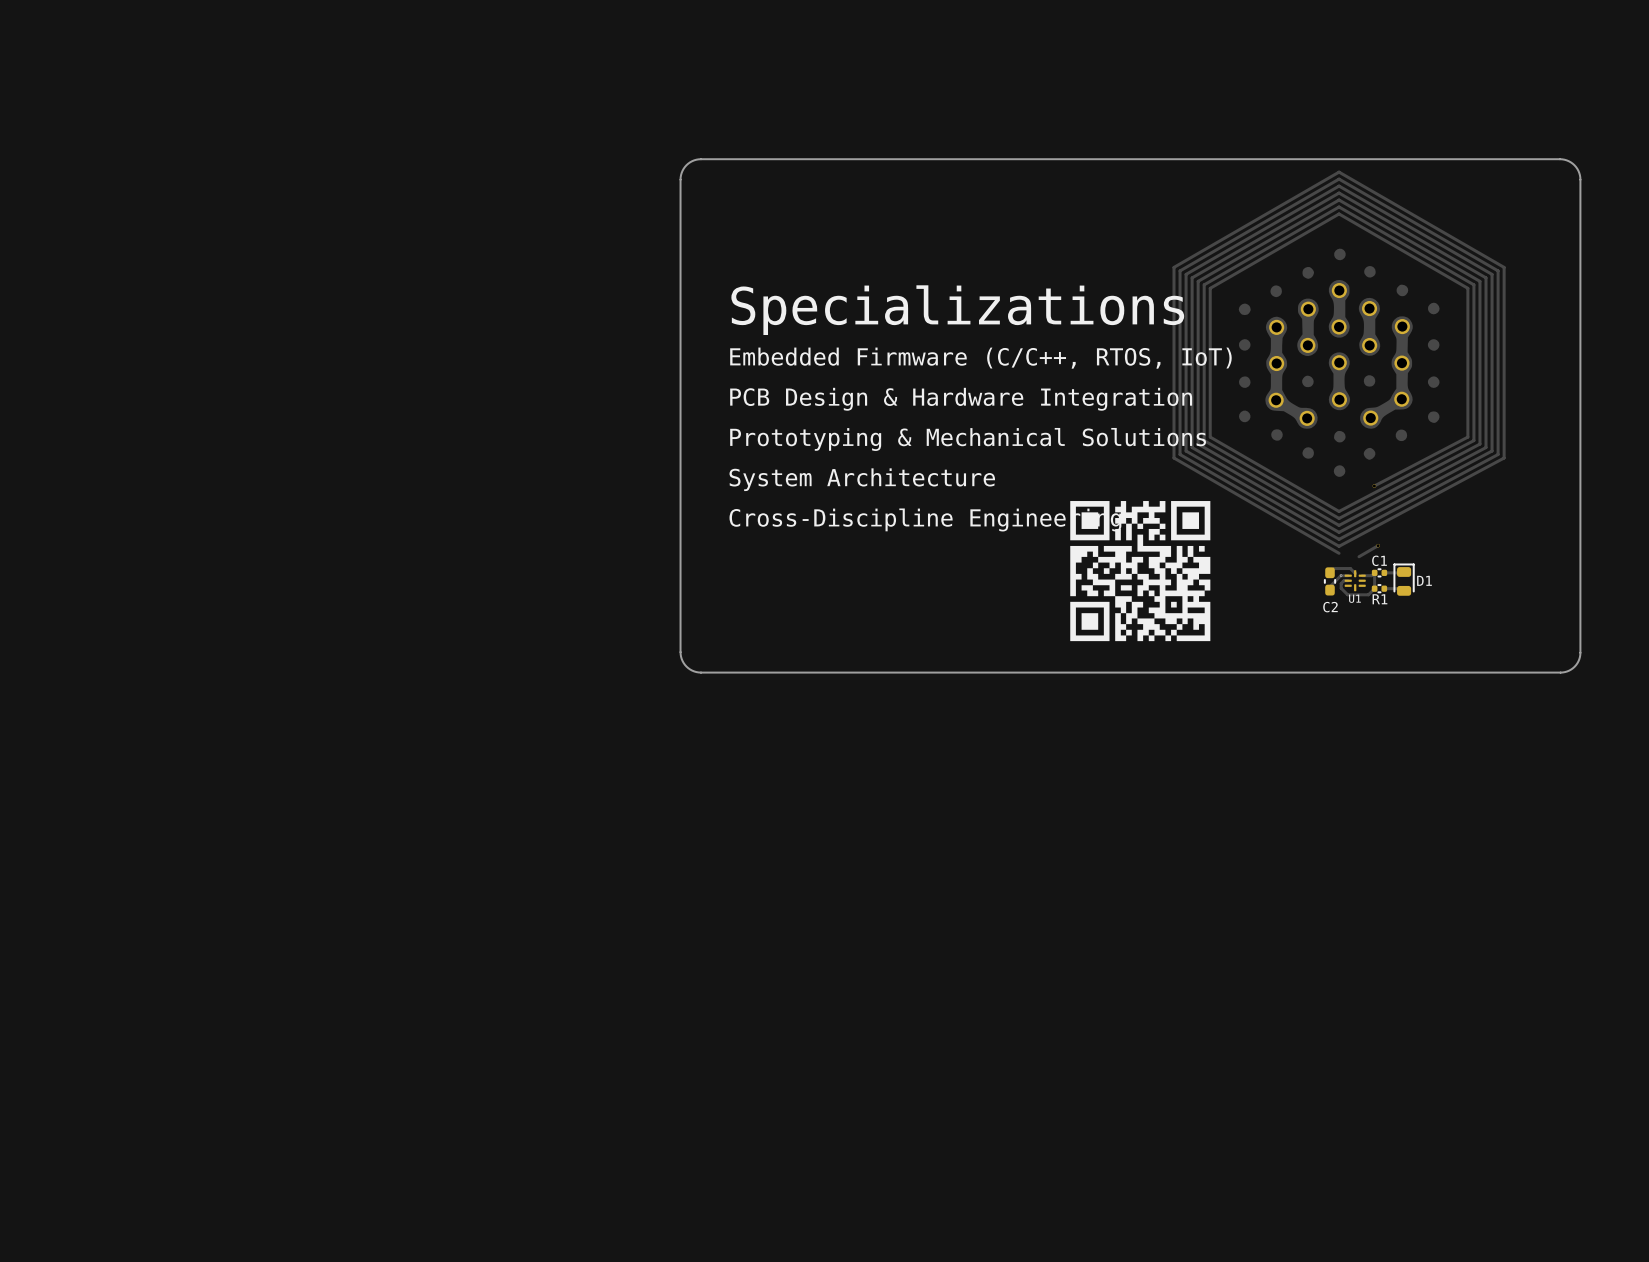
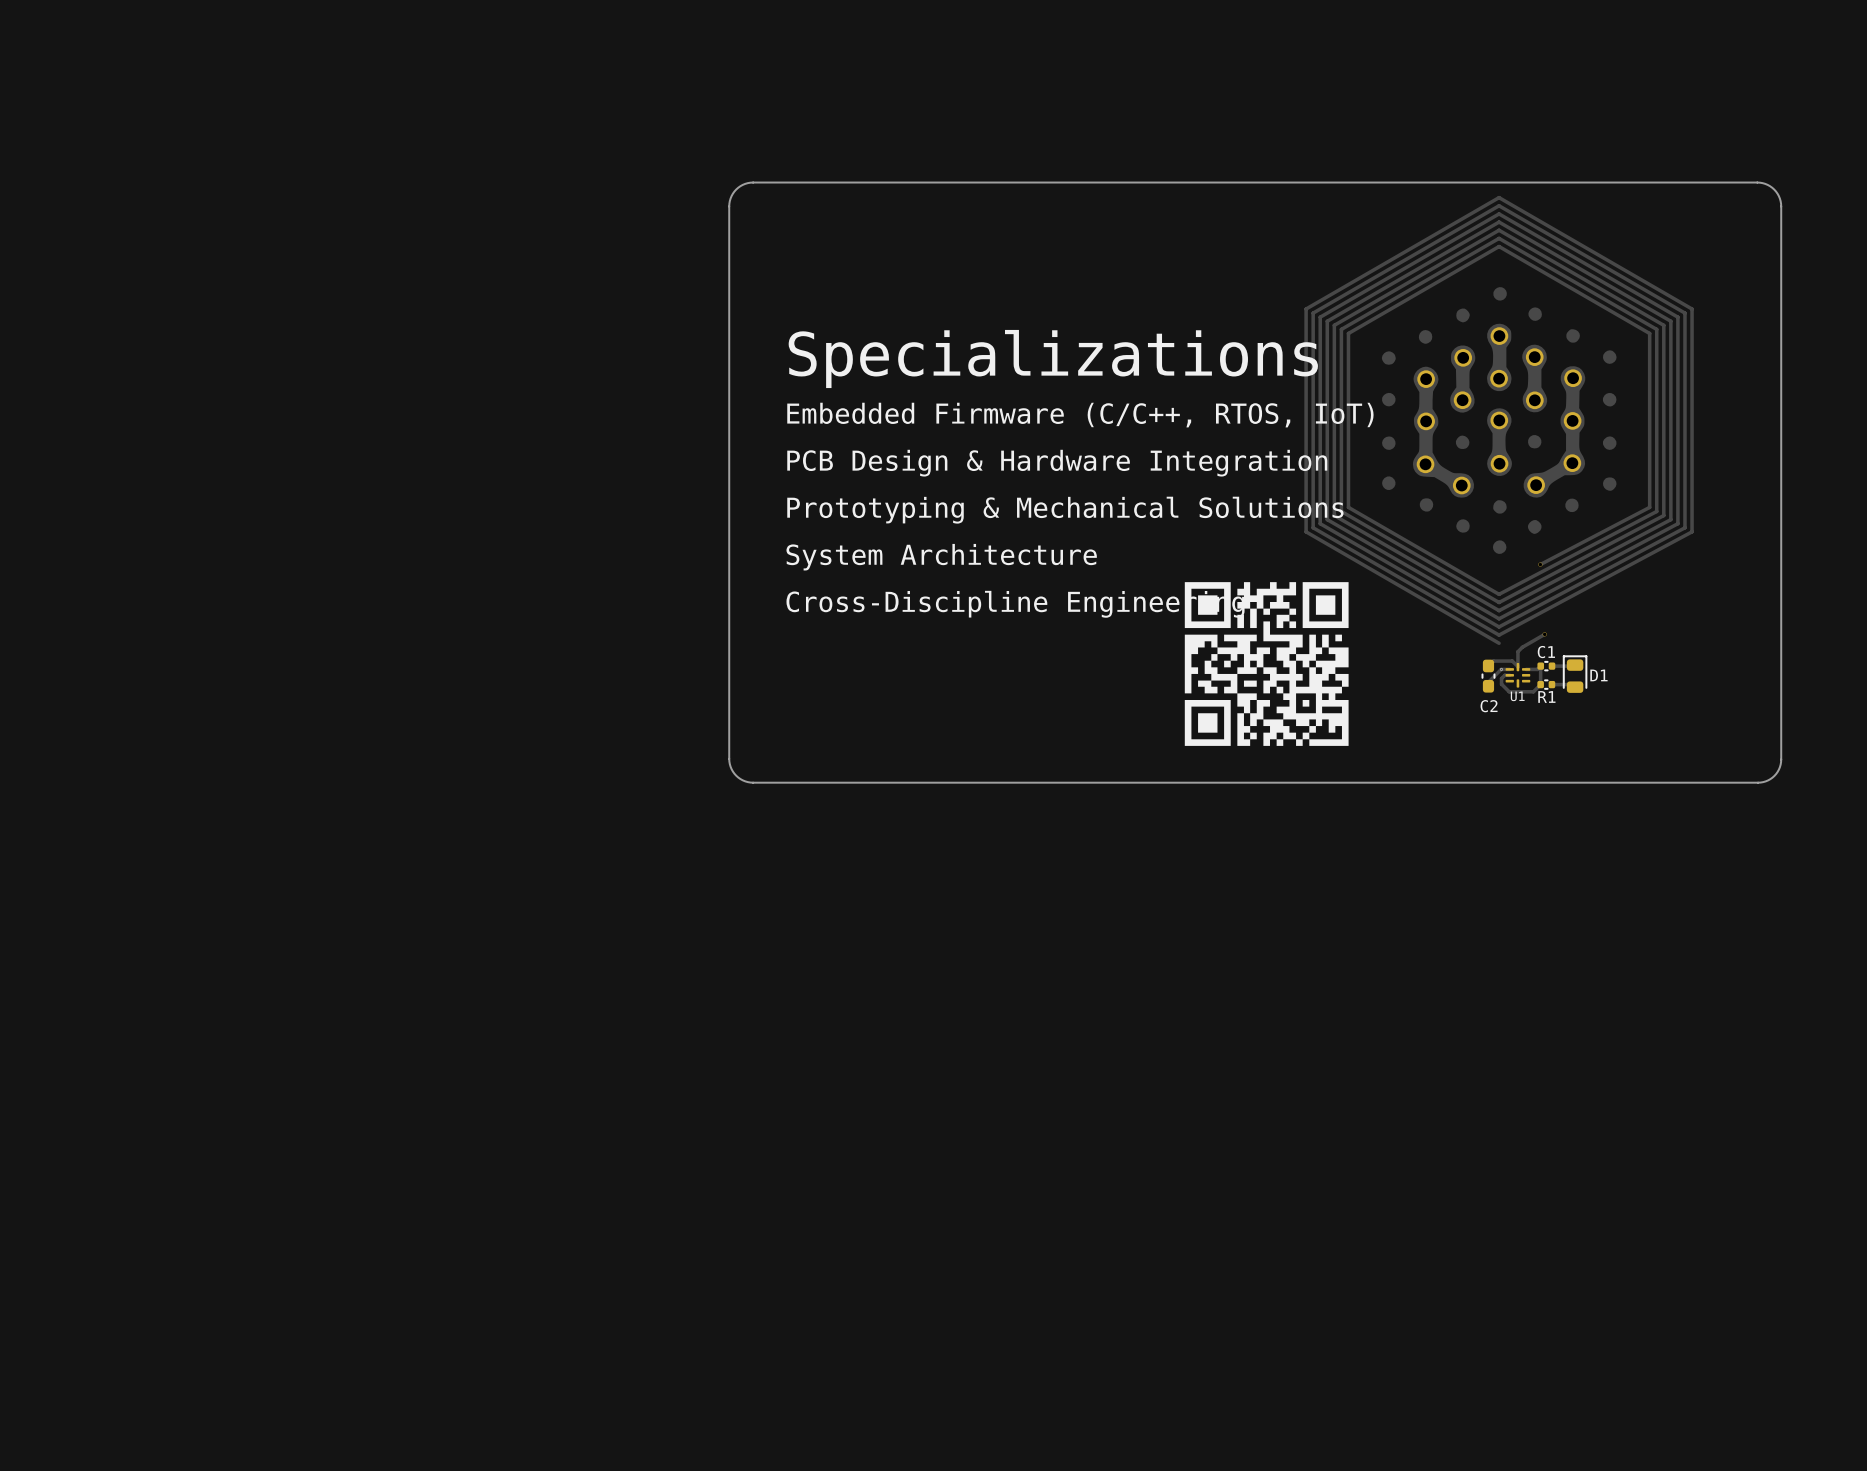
track: none -> (1522, 647) (1517, 651) (1517, 666)

